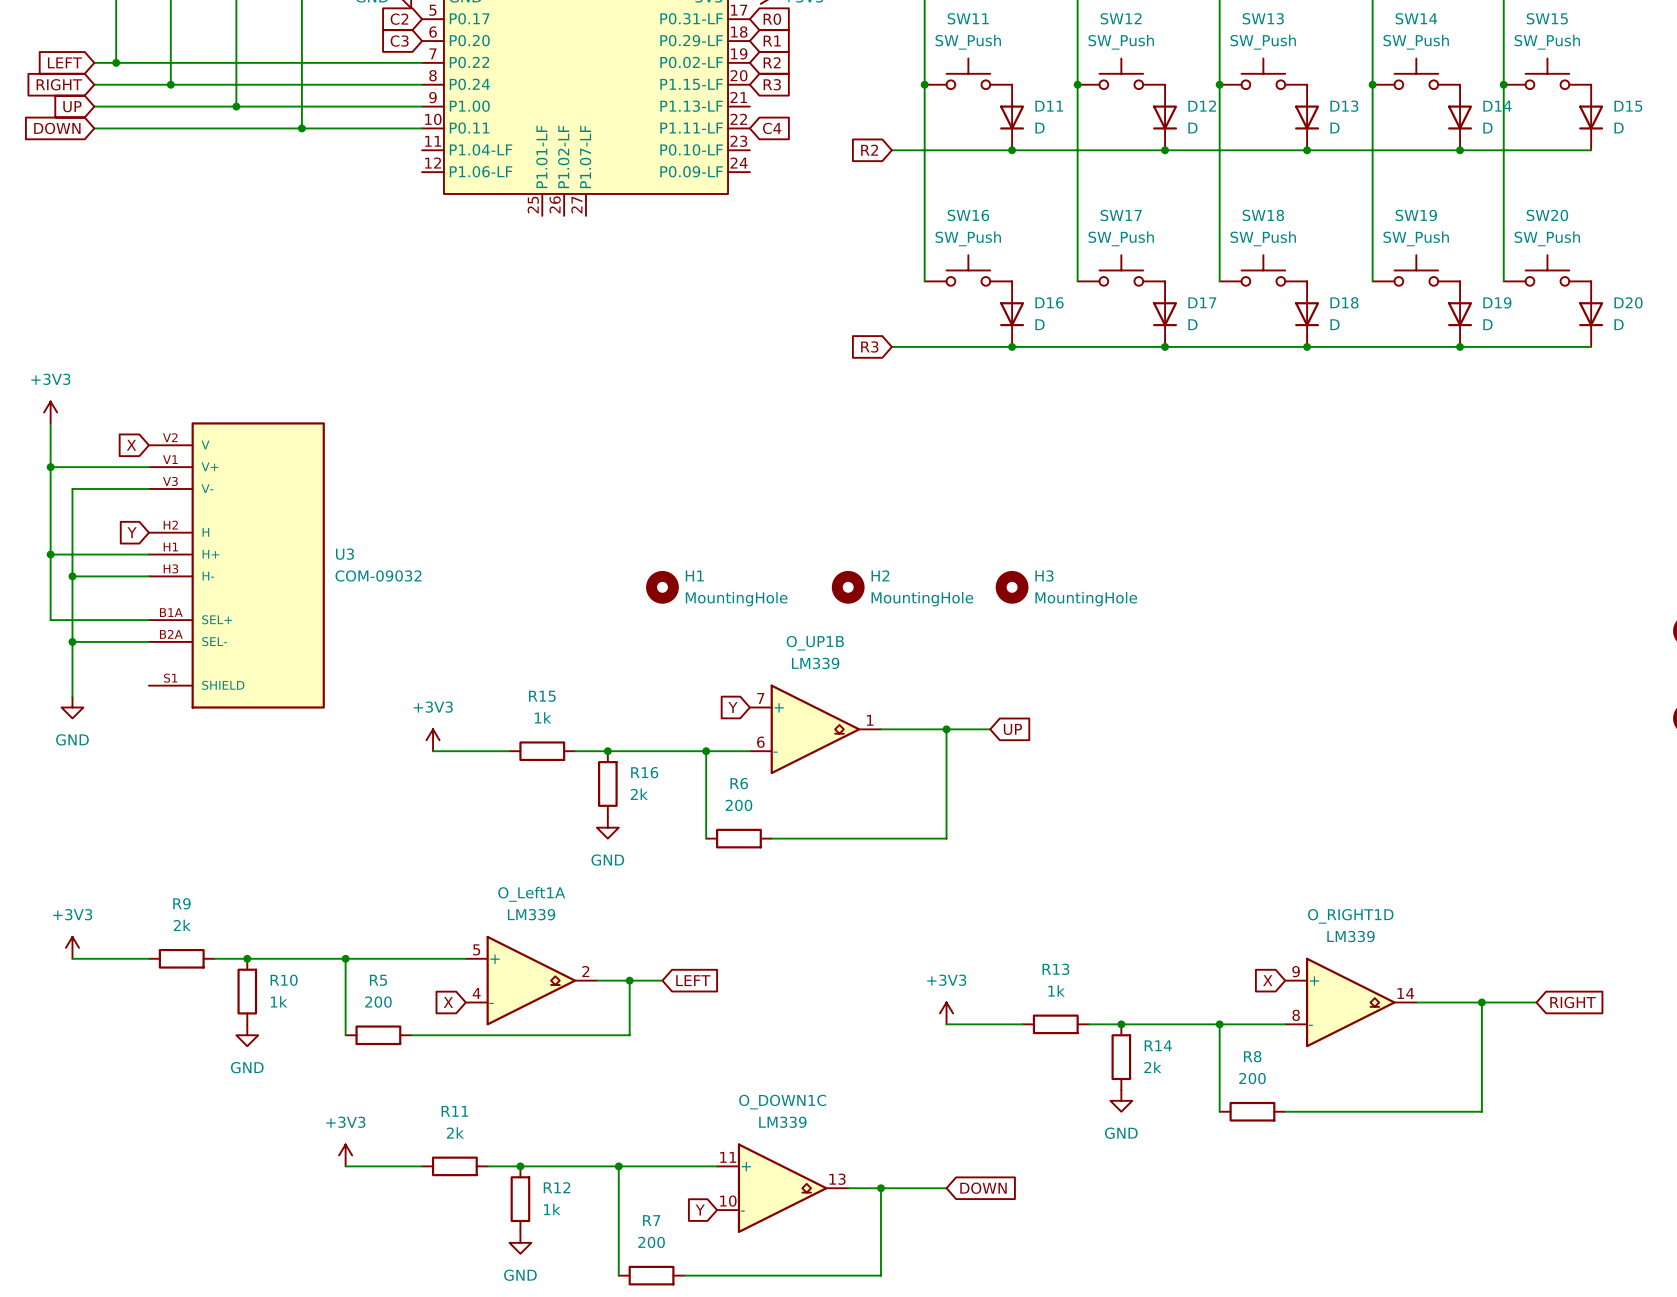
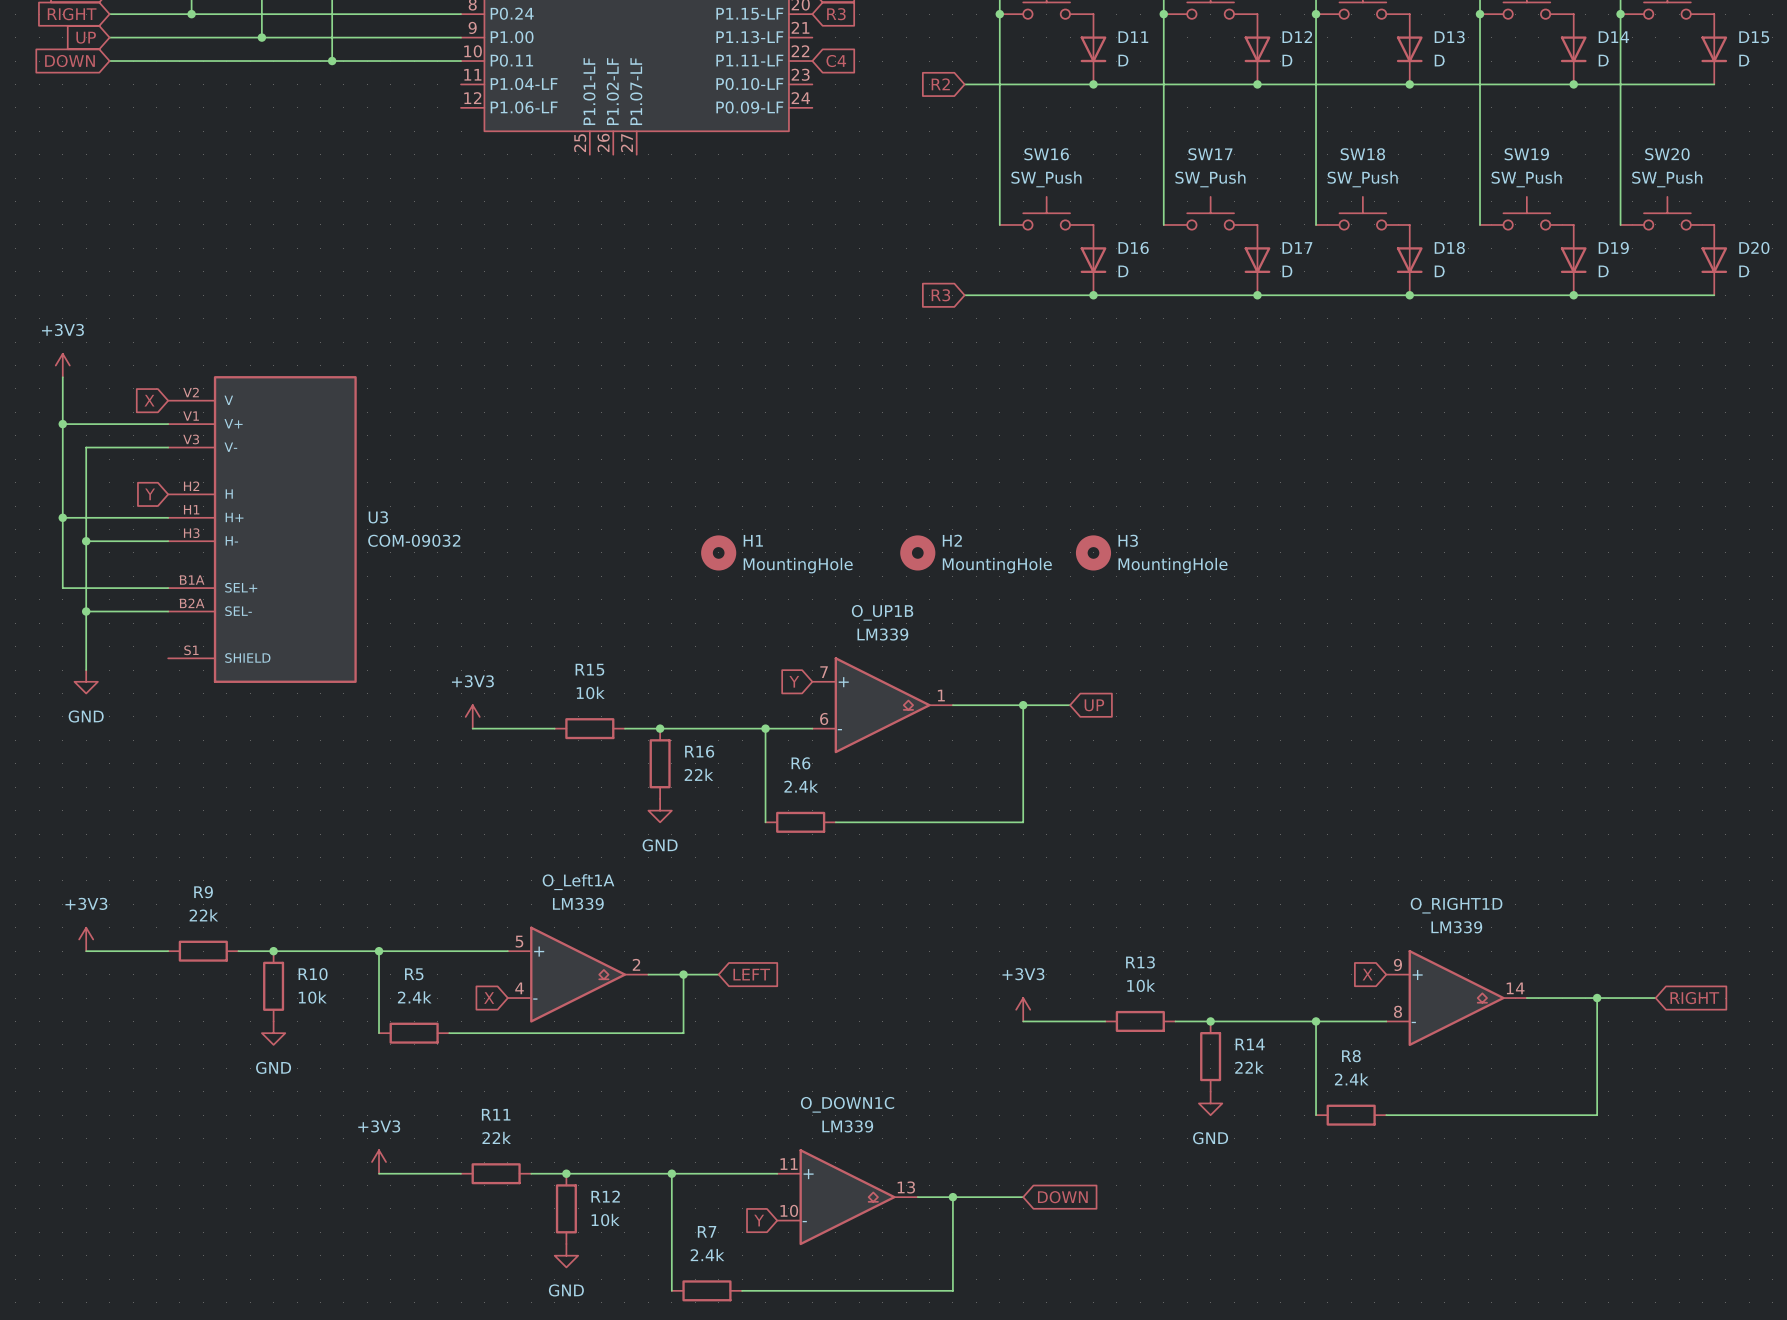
R15 value: 1k (543, 717) -> 10k (590, 692)
R16 value: 2k (639, 794) -> 22k (698, 774)
R6 value: 200 (739, 805) -> 2.4k (801, 786)
R9 value: 2k (182, 925) -> 22k (203, 915)
R13 value: 1k (1056, 990) -> 10k (1141, 985)
R10 value: 1k (279, 1001) -> 10k (312, 997)
R5 value: 200 (378, 1002) -> 2.4k (414, 997)
R14 value: 2k (1152, 1067) -> 22k (1249, 1067)
R8 value: 200 (1252, 1078) -> 2.4k (1351, 1079)
R11 value: 2k (455, 1132) -> 22k (496, 1137)
R12 value: 1k (552, 1209) -> 10k (605, 1220)
R7 value: 200 (651, 1242) -> 2.4k (707, 1255)

